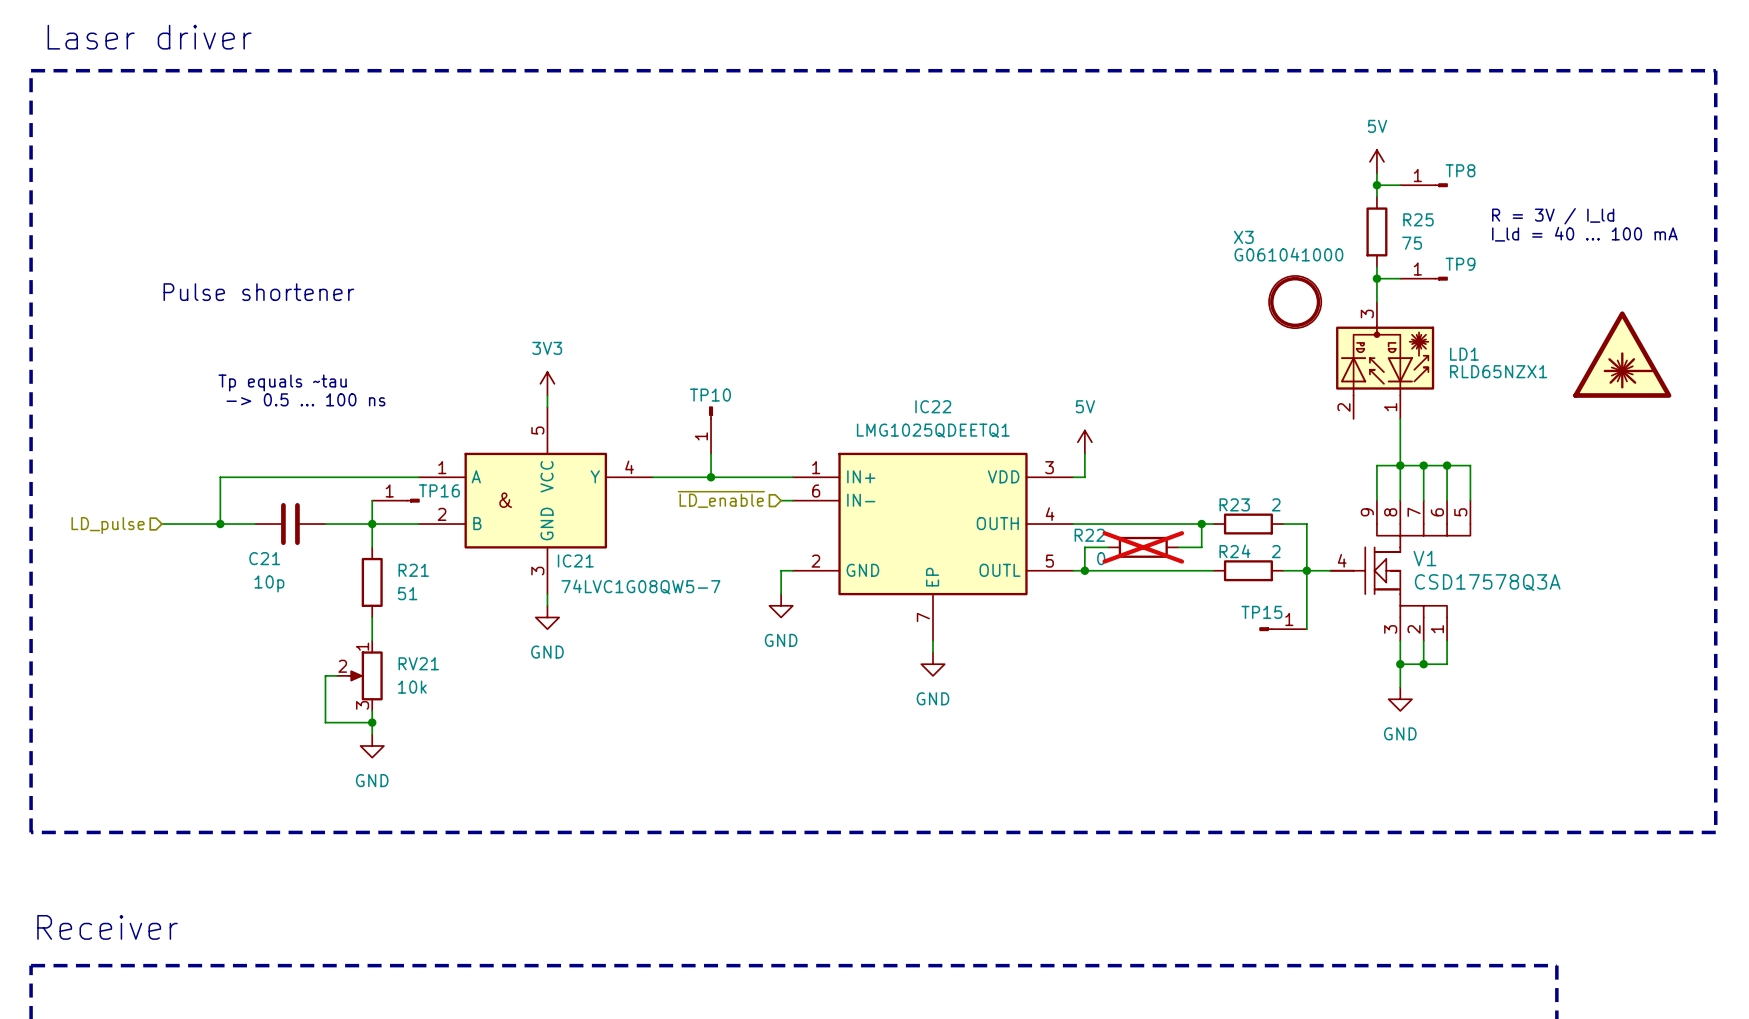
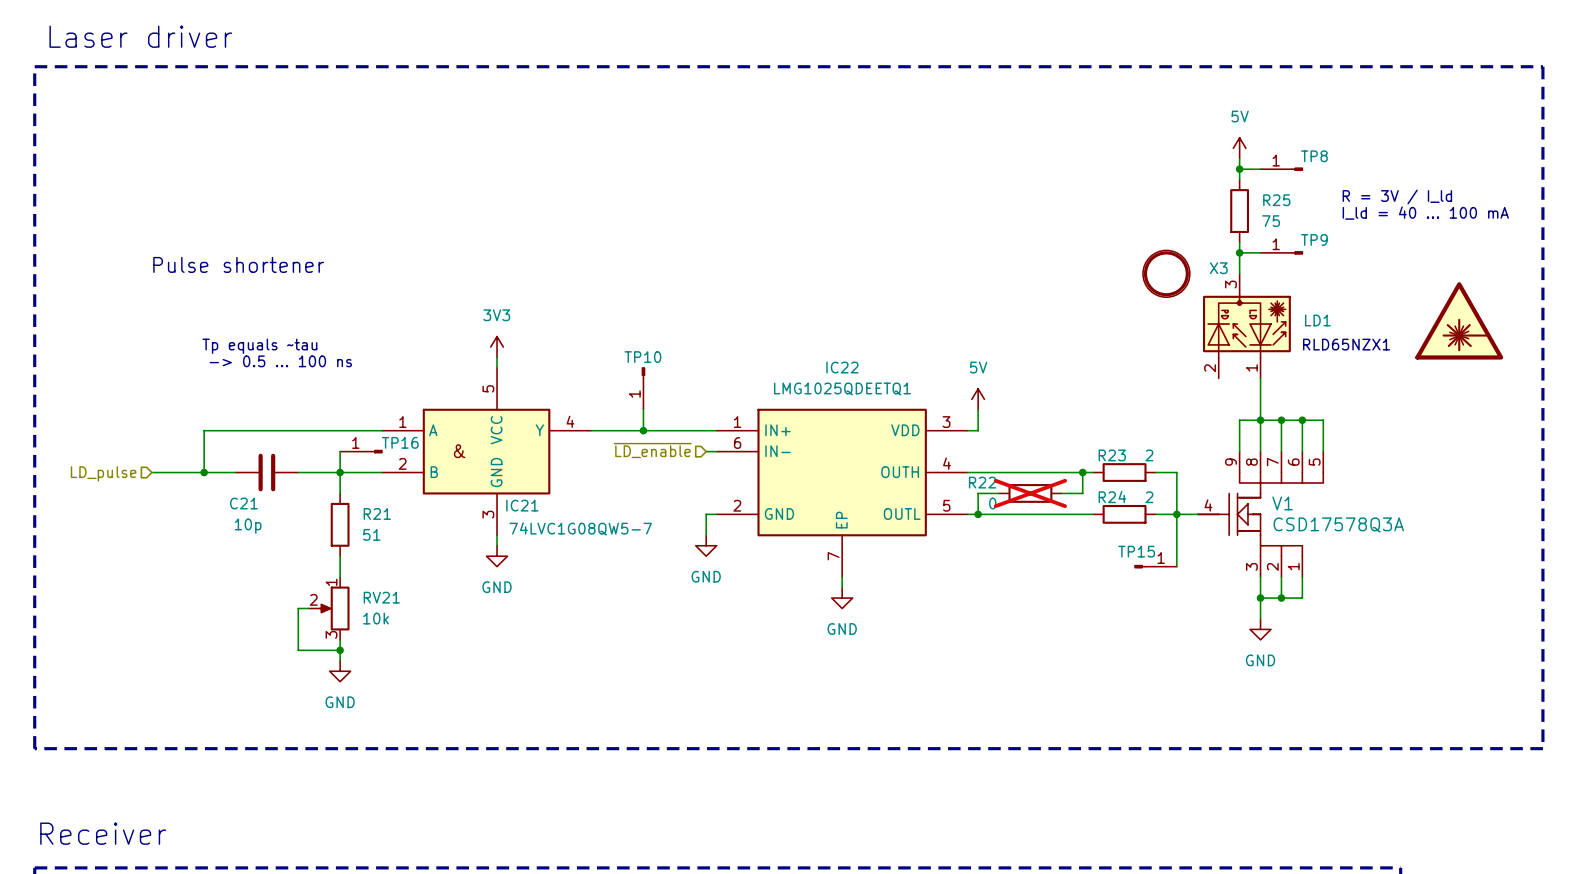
X3 name position: X3 (1243, 237) -> X3 (1218, 268)
X3 value: G061041000 (1288, 254) -> none
LD1 value: RLD65NZX1 (1498, 371) -> none
text: none -> RLD65NZX1 (1346, 344)

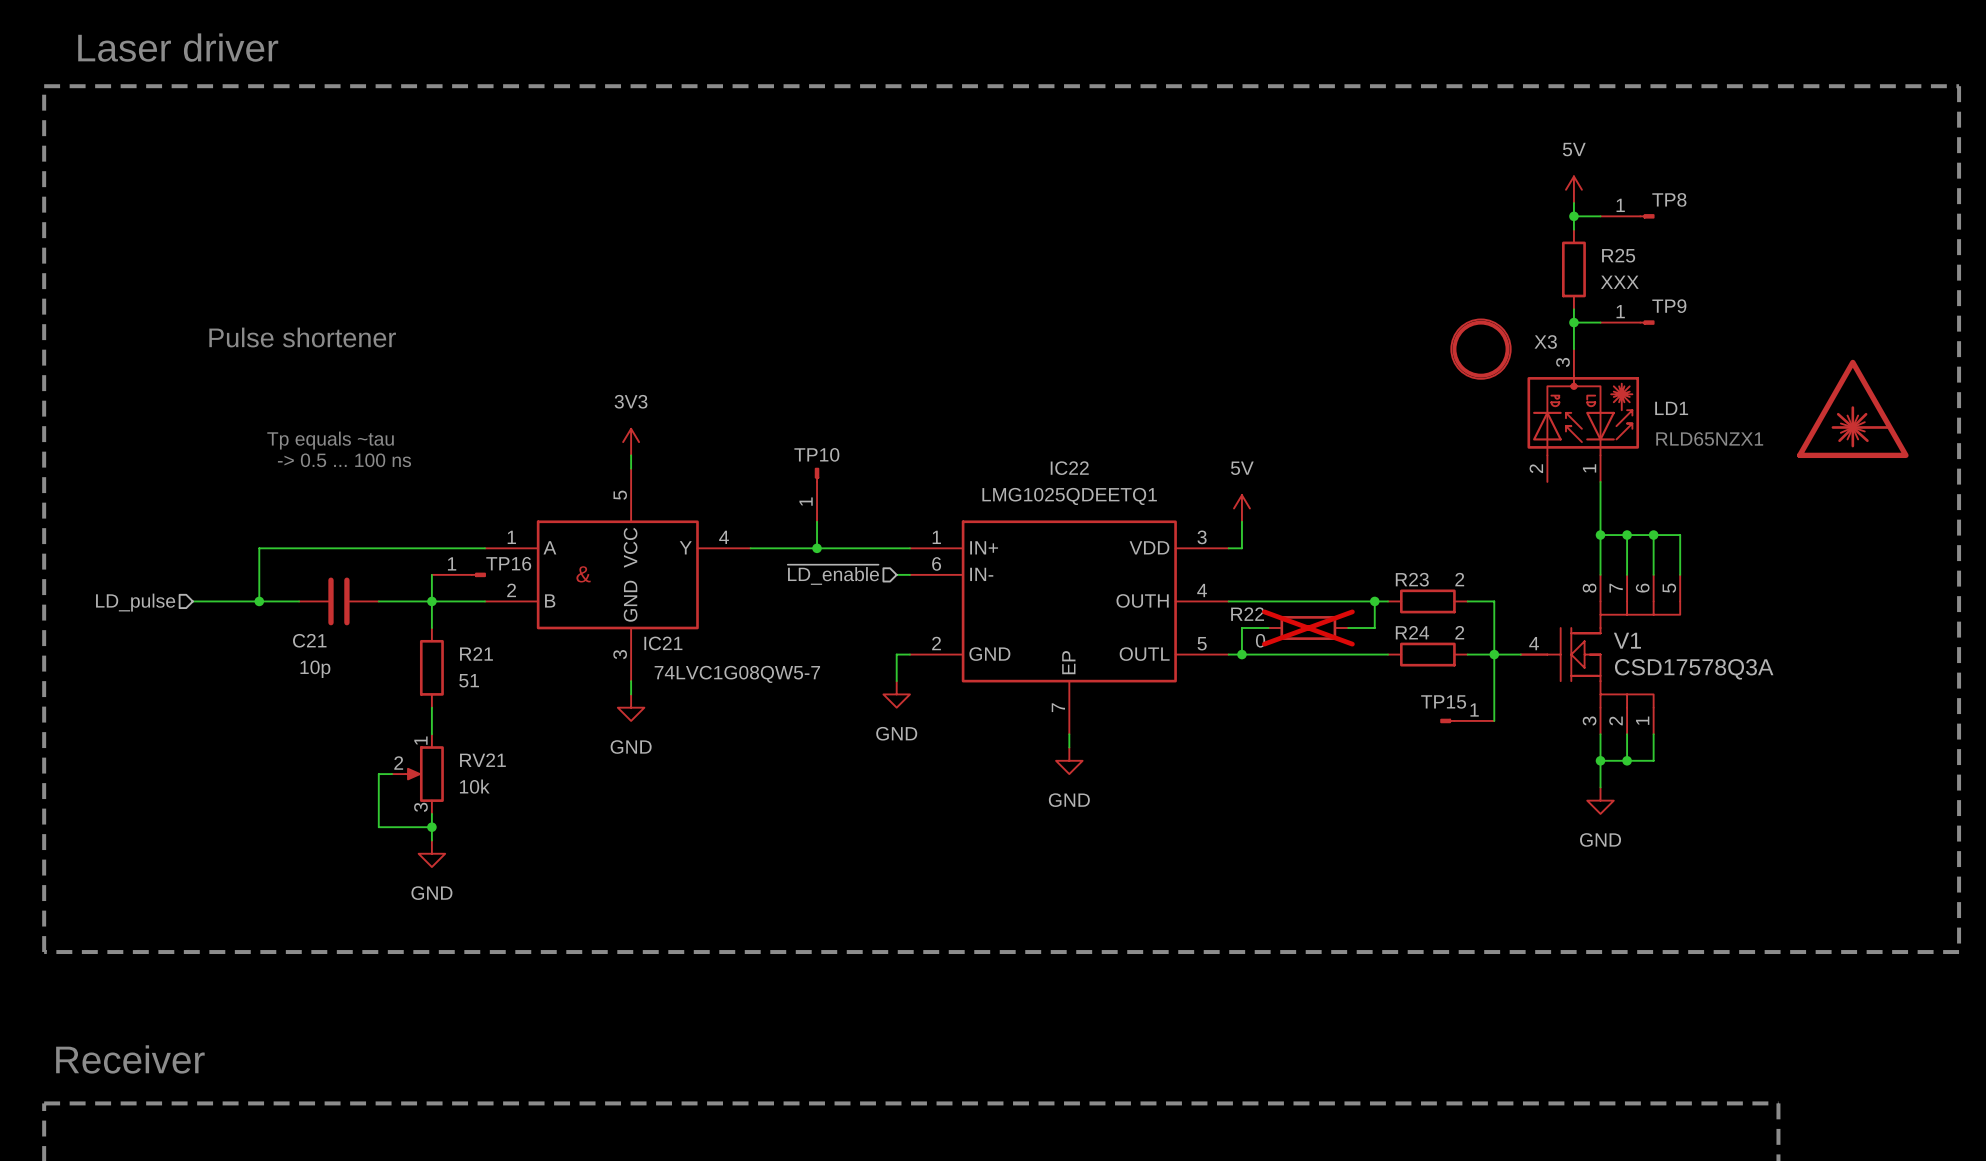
text: R = 3V / I_ld (1397, 197) -> none
text: I_ld = 40 ... 100 mA (1425, 213) -> none
R25 value: 75 (1271, 221) -> XXX (1619, 282)
wire: (1260, 420) (1239, 420) (1239, 451) -> none
V1 symbol: [1197, 451, 1324, 578] -> [1520, 574, 1681, 735]

